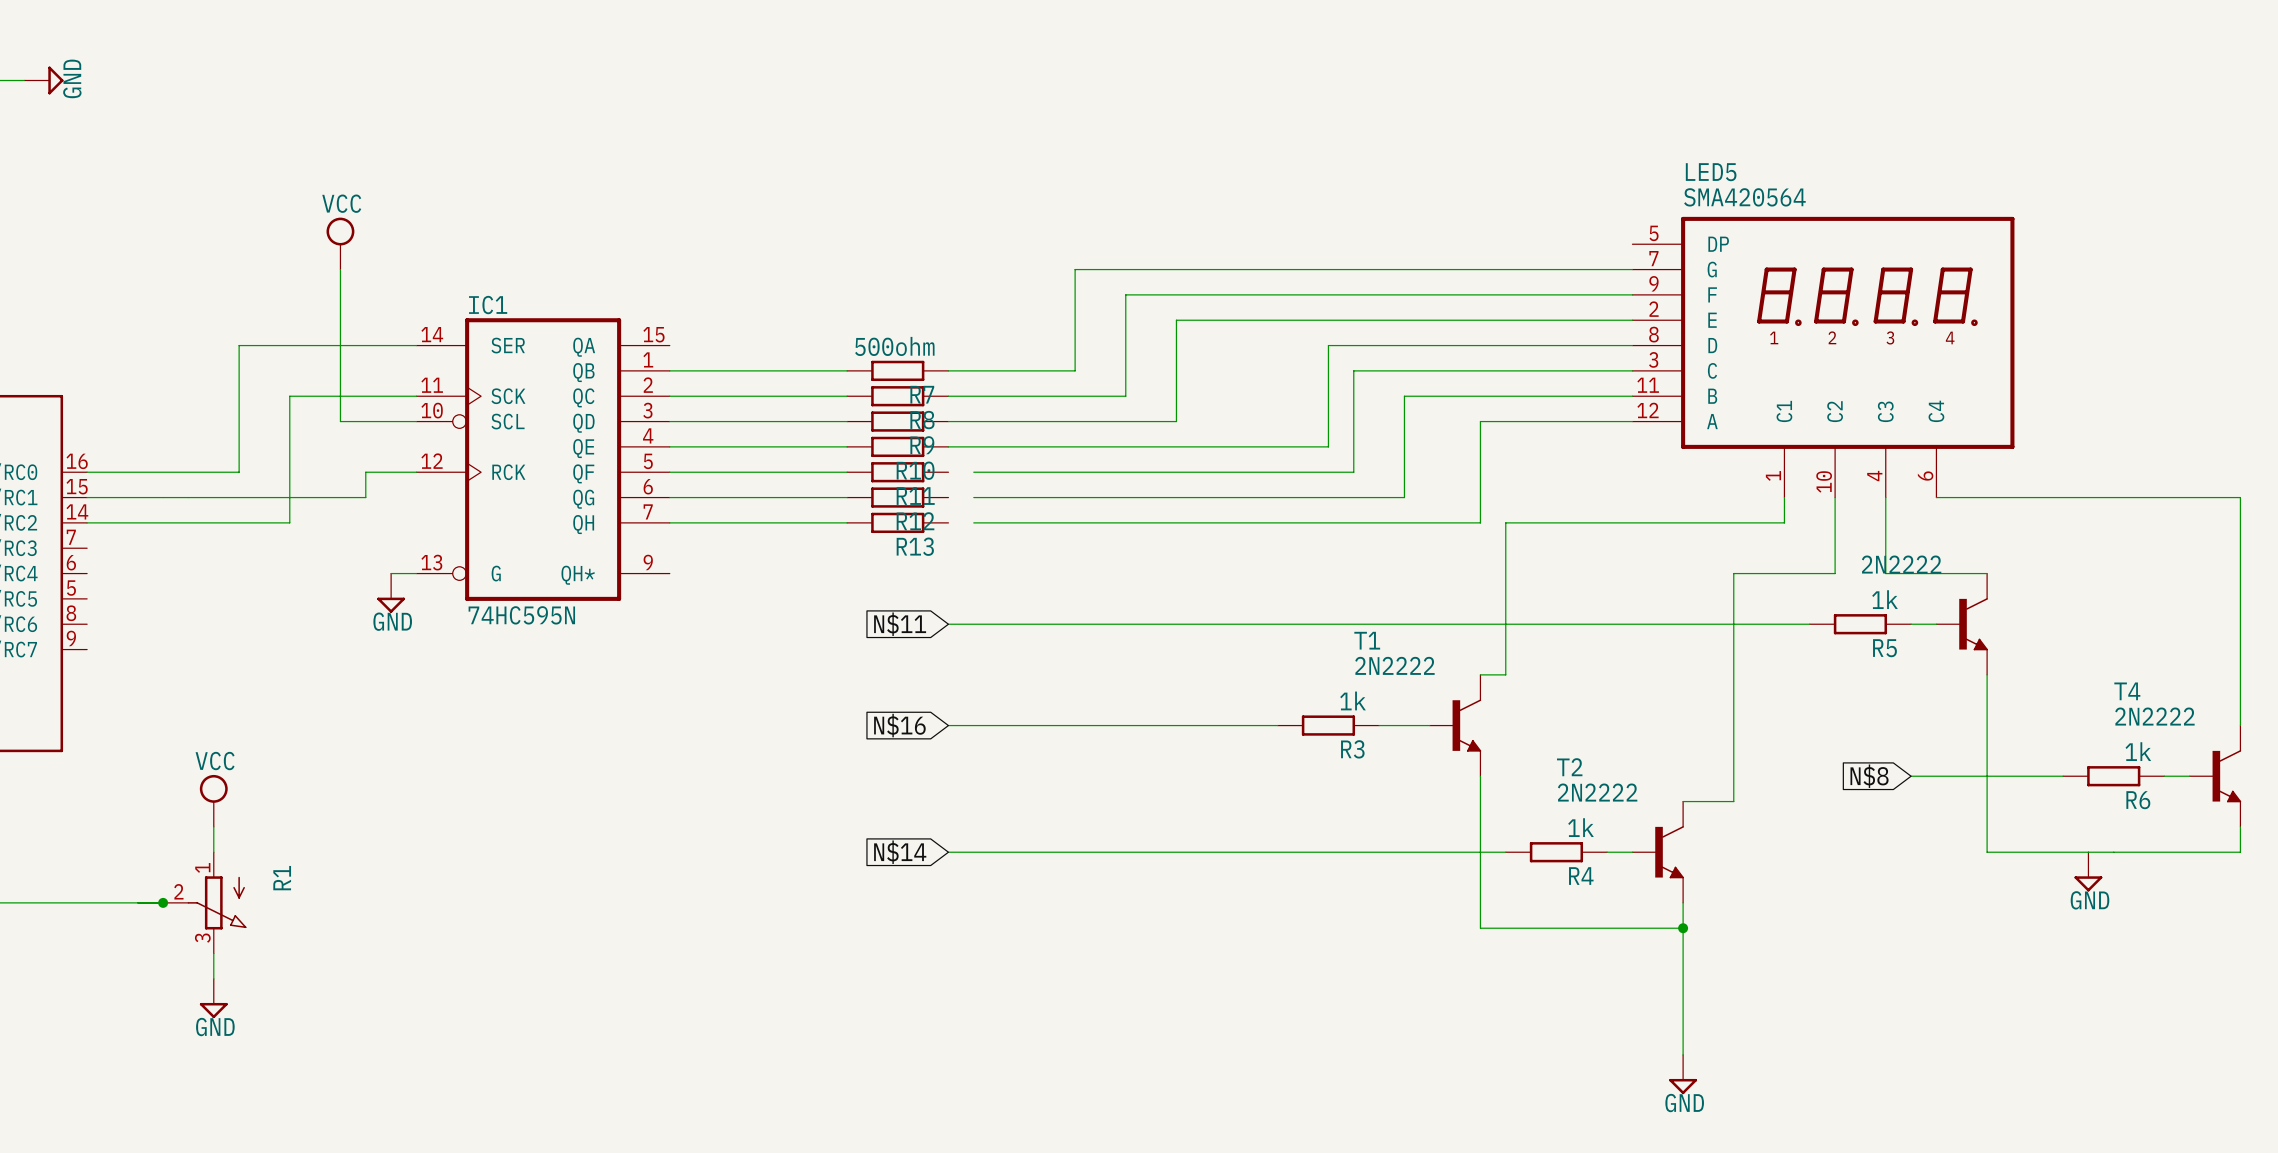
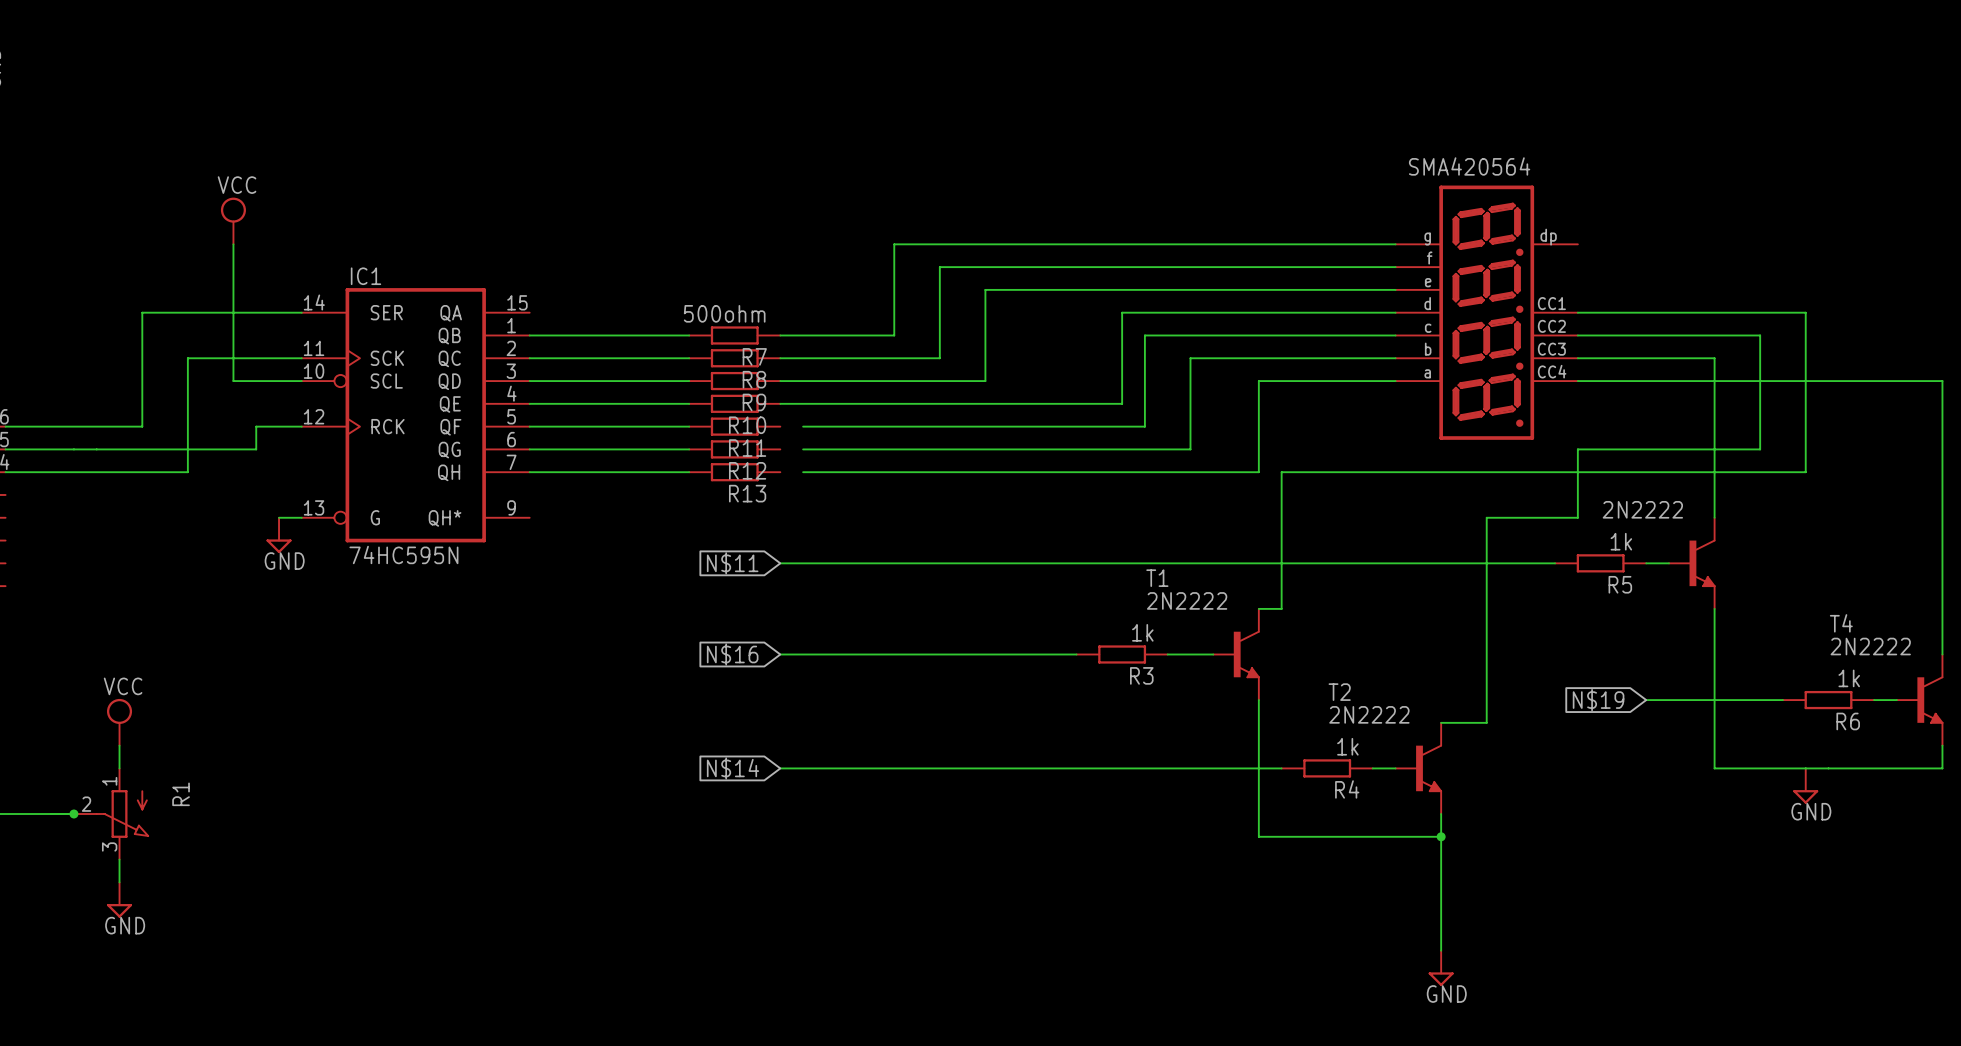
SMA420564: none -> (1486, 312)
LED5: SMA420564 (1823, 357) -> none
wire: none -> (1577, 335) (1760, 335) (1760, 449)
wire: (1784, 497) (1784, 522) -> (1577, 312) (1805, 312) (1805, 472) (1532, 472)
wire: none -> (1577, 449) (1669, 449)
wire: (1885, 497) (1885, 573) (1987, 573) -> (1577, 358) (1714, 358) (1714, 517)
wire: (2037, 497) (2240, 497) -> (1577, 381) (1942, 381) (1942, 449)
global label: N$8 (1869, 776) -> N$19 (1598, 700)

